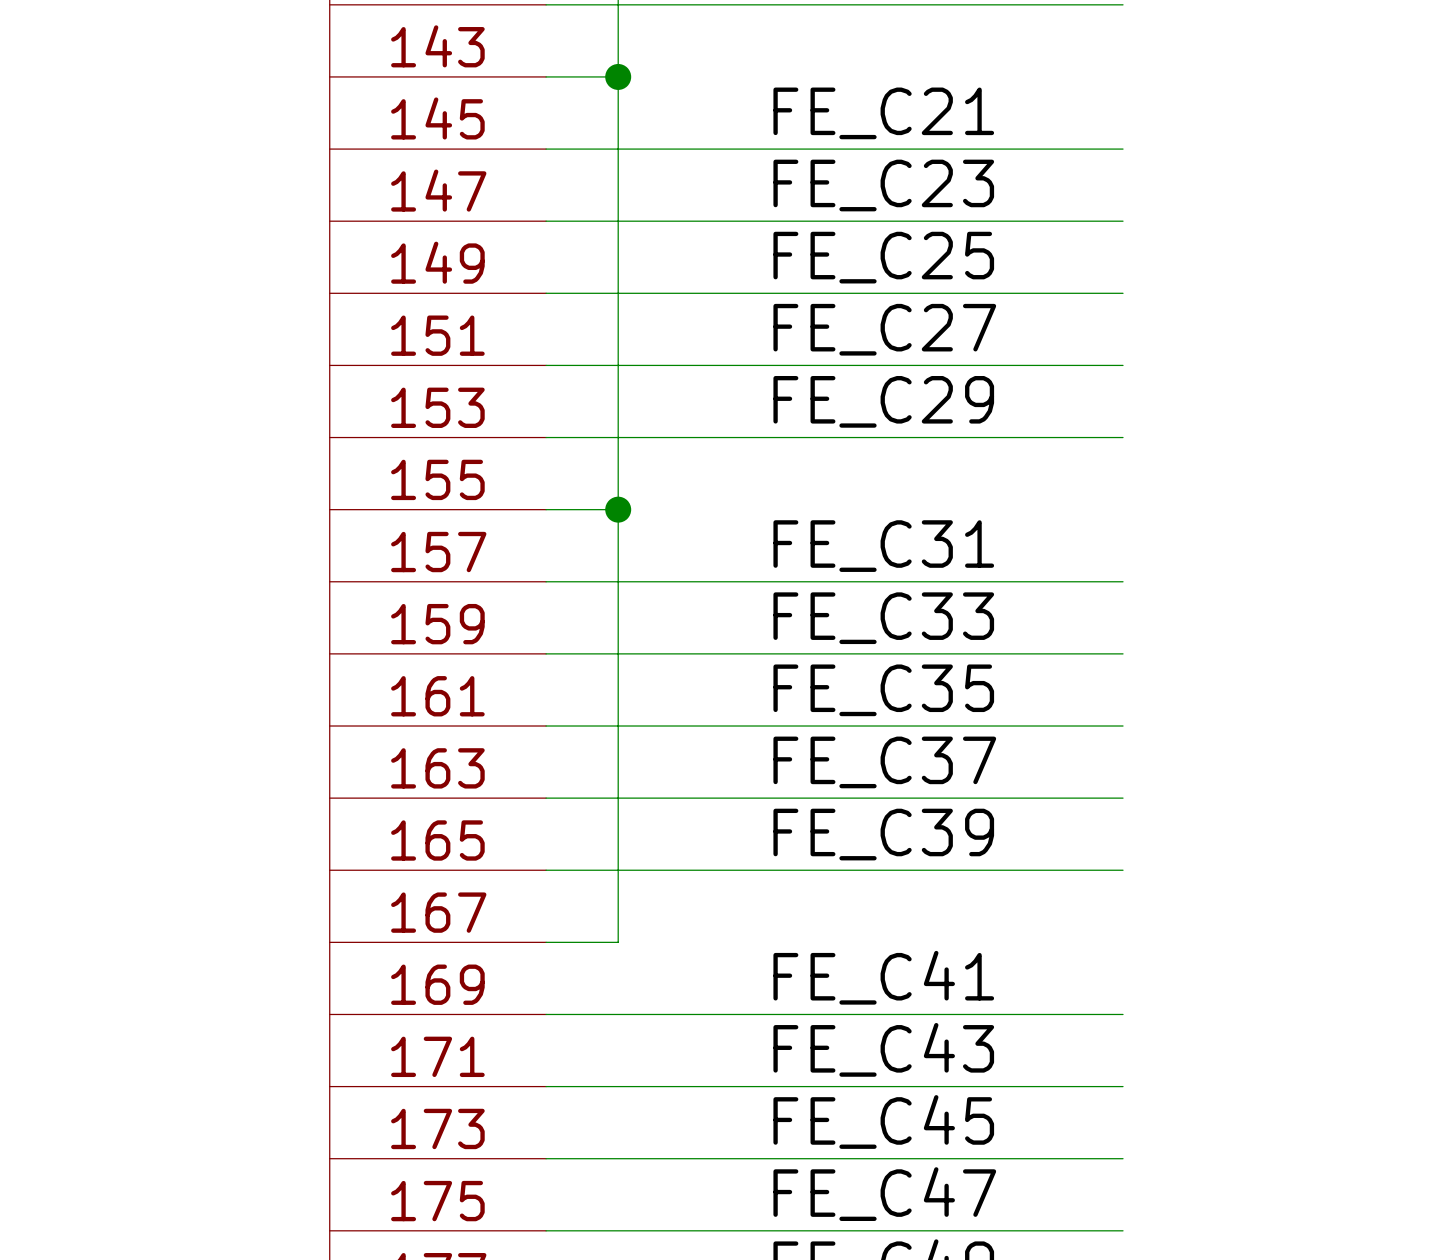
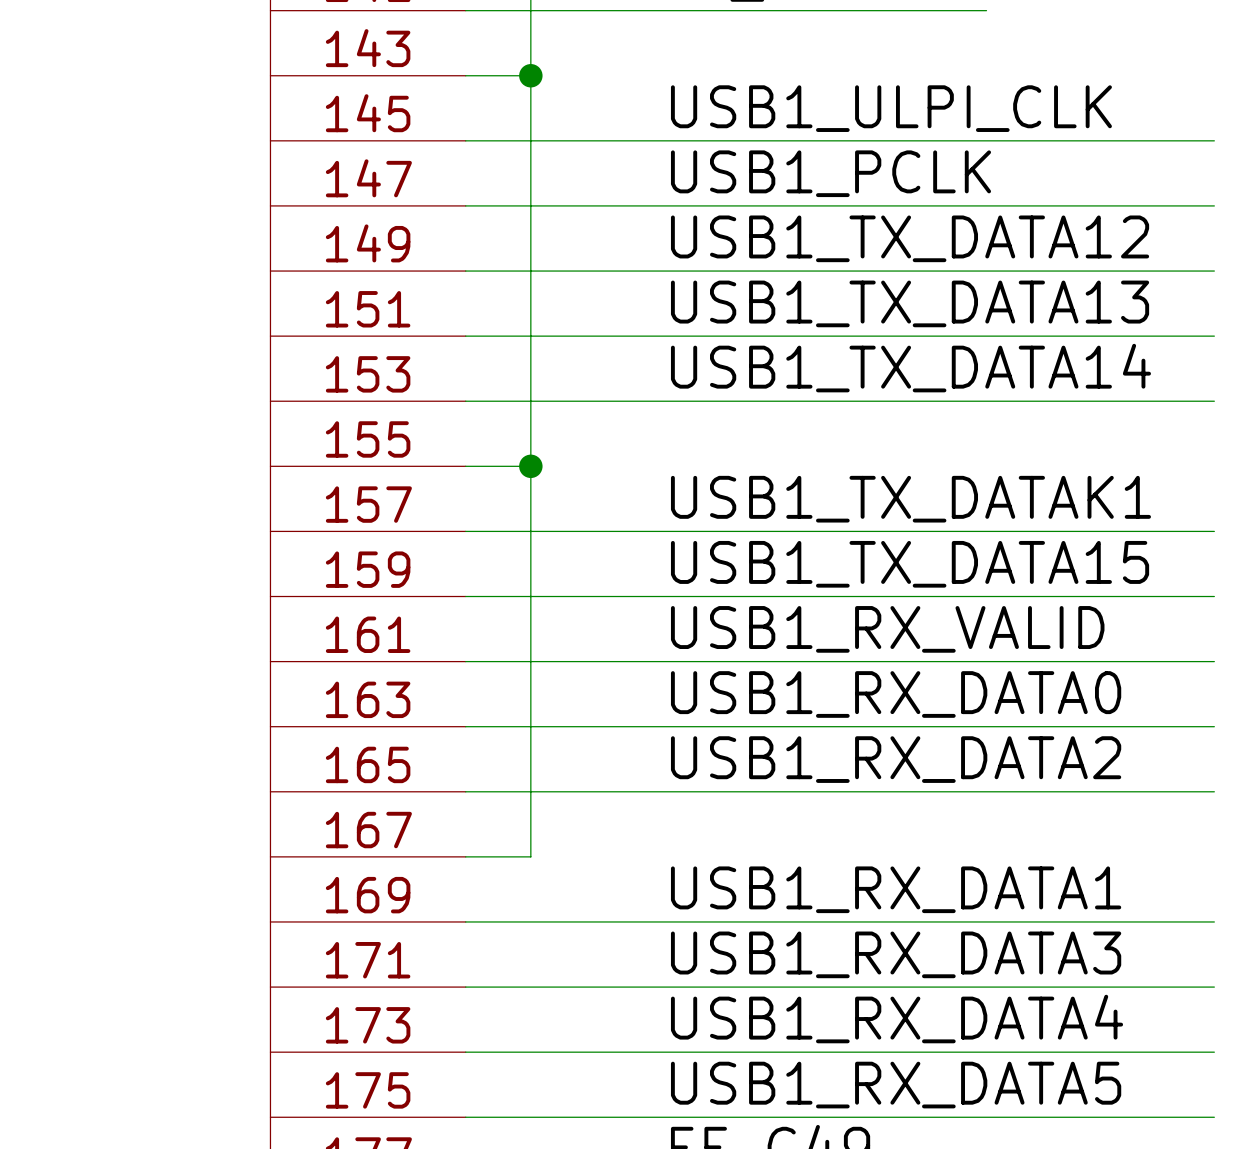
label: FE_C21 (883, 113) -> USB1_ULPI_CLK (891, 108)
wire: none -> (986, 140) (1214, 140)
label: FE_C23 (883, 185) -> USB1_PCLK (830, 173)
wire: none -> (986, 205) (1214, 205)
label: FE_C25 (883, 257) -> USB1_TX_DATA12 (910, 238)
wire: none -> (986, 271) (1214, 271)
label: FE_C27 (884, 329) -> USB1_TX_DATA13 (910, 303)
wire: none -> (986, 336) (1214, 336)
label: FE_C29 (883, 401) -> USB1_TX_DATA14 (910, 368)
wire: none -> (986, 401) (1214, 401)
label: FE_C31 (883, 546) -> USB1_TX_DATAK1 (910, 499)
wire: none -> (986, 531) (1214, 531)
label: FE_C33 (883, 618) -> USB1_TX_DATA15 (910, 564)
wire: none -> (986, 596) (1214, 596)
label: FE_C35 (883, 690) -> USB1_RX_VALID (887, 629)
wire: none -> (986, 661) (1214, 661)
label: FE_C37 (884, 762) -> USB1_RX_DATA0 (896, 694)
wire: none -> (986, 726) (1214, 726)
label: FE_C39 (883, 834) -> USB1_RX_DATA2 (896, 759)
wire: none -> (986, 791) (1214, 791)
label: FE_C41 (883, 977) -> USB1_RX_DATA1 (896, 889)
wire: none -> (986, 921) (1214, 921)
label: FE_C43 (883, 1049) -> USB1_RX_DATA3 (896, 954)
wire: none -> (986, 987) (1214, 987)
label: FE_C45 (883, 1121) -> USB1_RX_DATA4 (897, 1019)
wire: none -> (986, 1052) (1214, 1052)
label: FE_C47 (884, 1194) -> USB1_RX_DATA5 (896, 1085)
wire: none -> (986, 1117) (1214, 1117)

